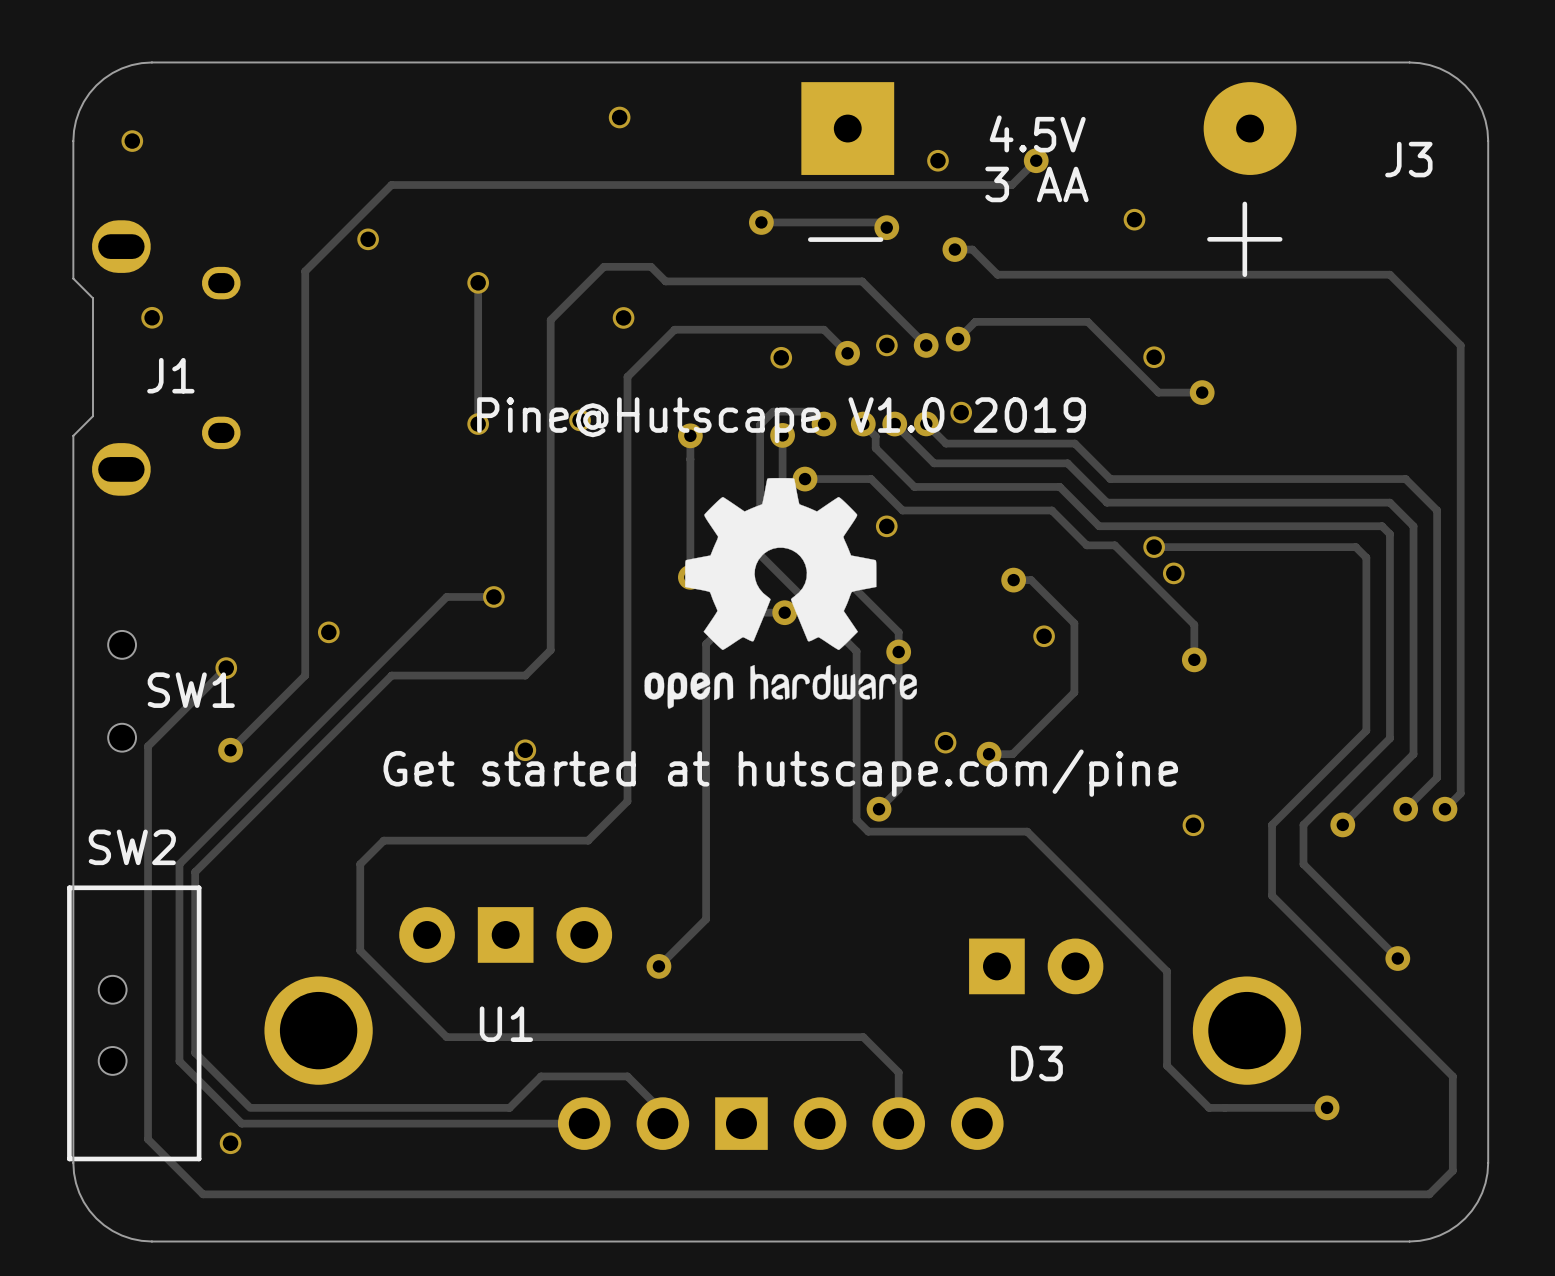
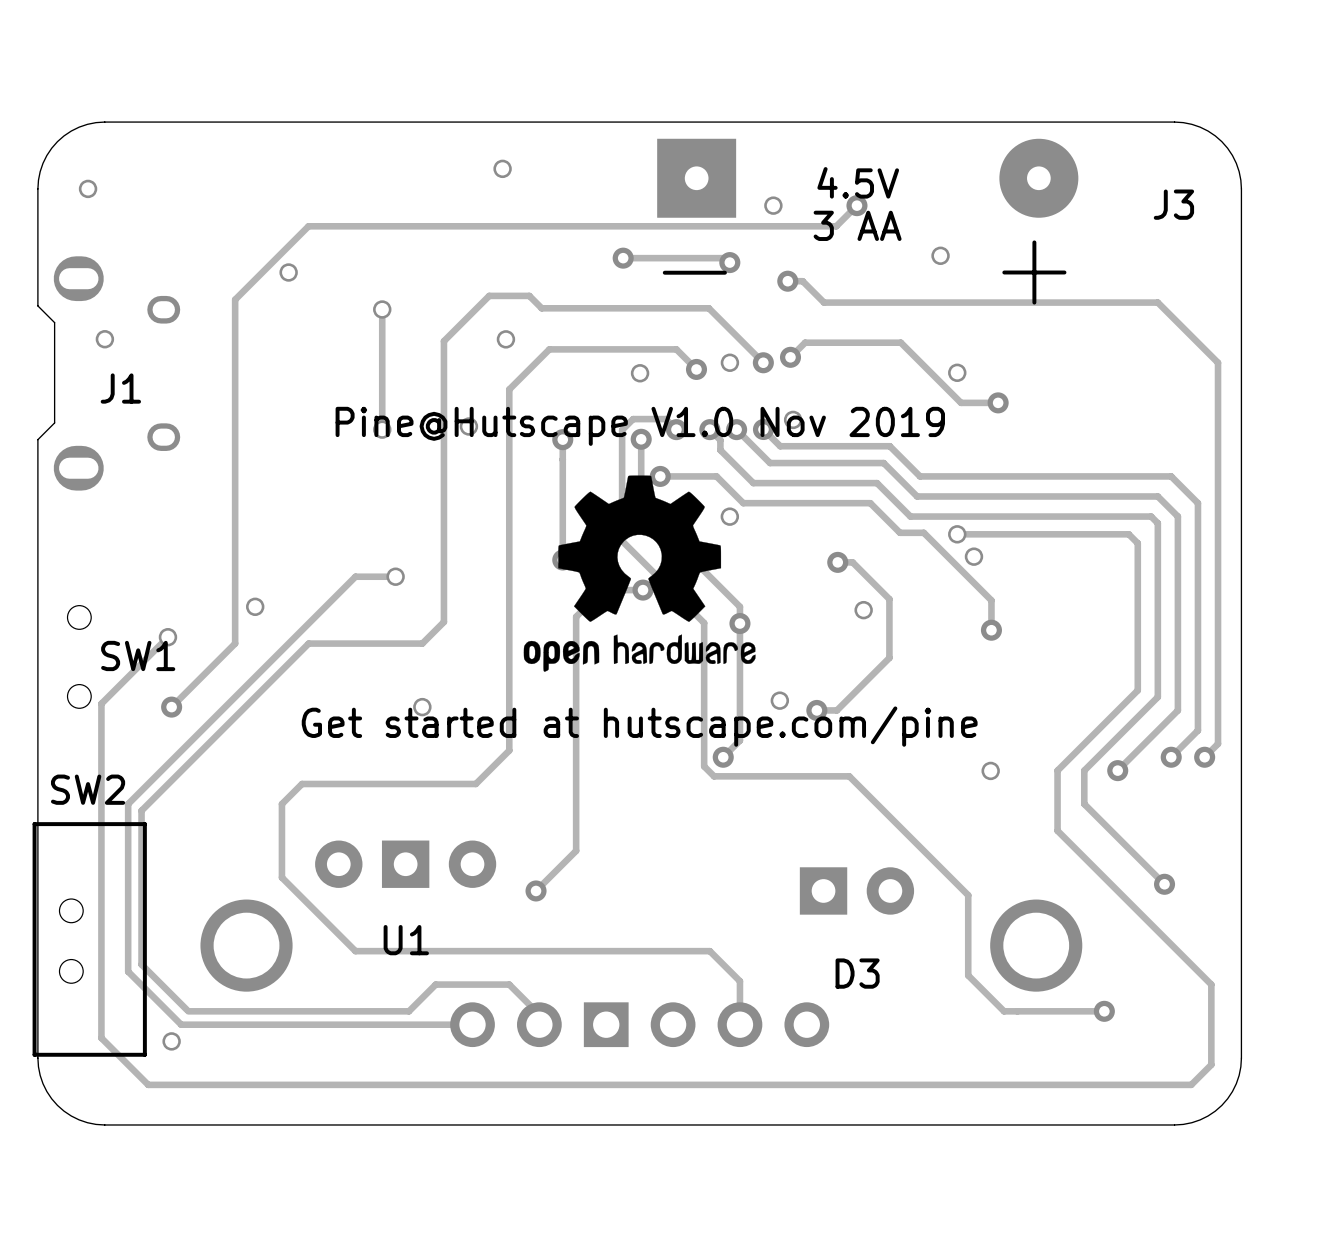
text: Pine@Hutscape V1.0 2019 (781, 420) -> Pine@Hutscape V1.0 Nov 2019 (640, 426)

